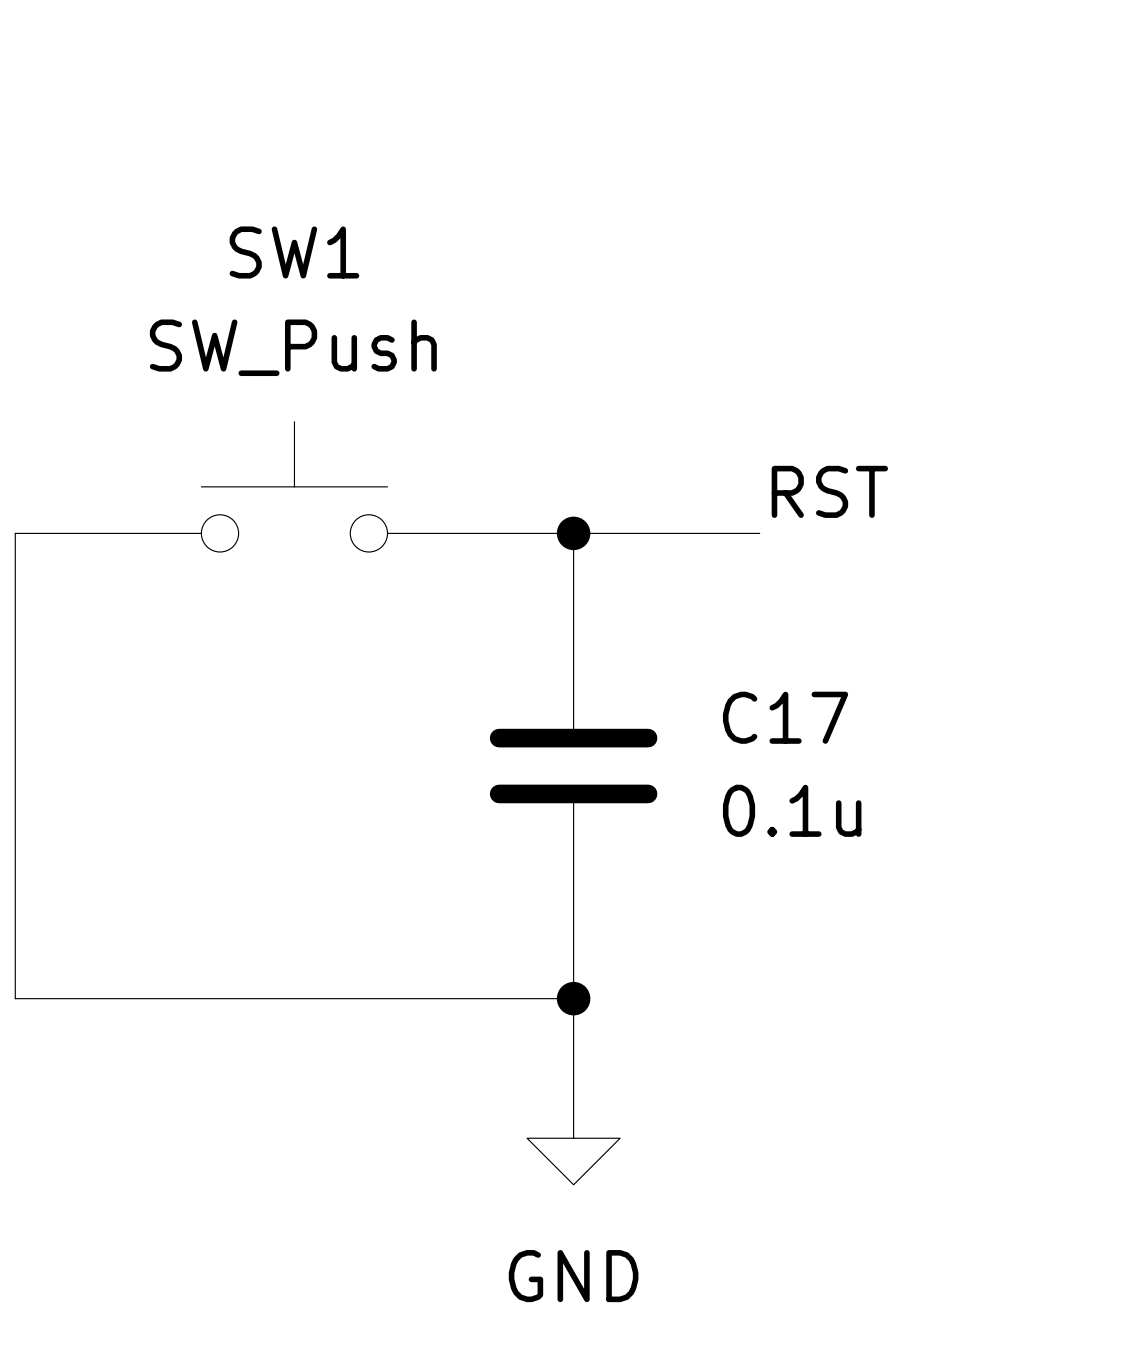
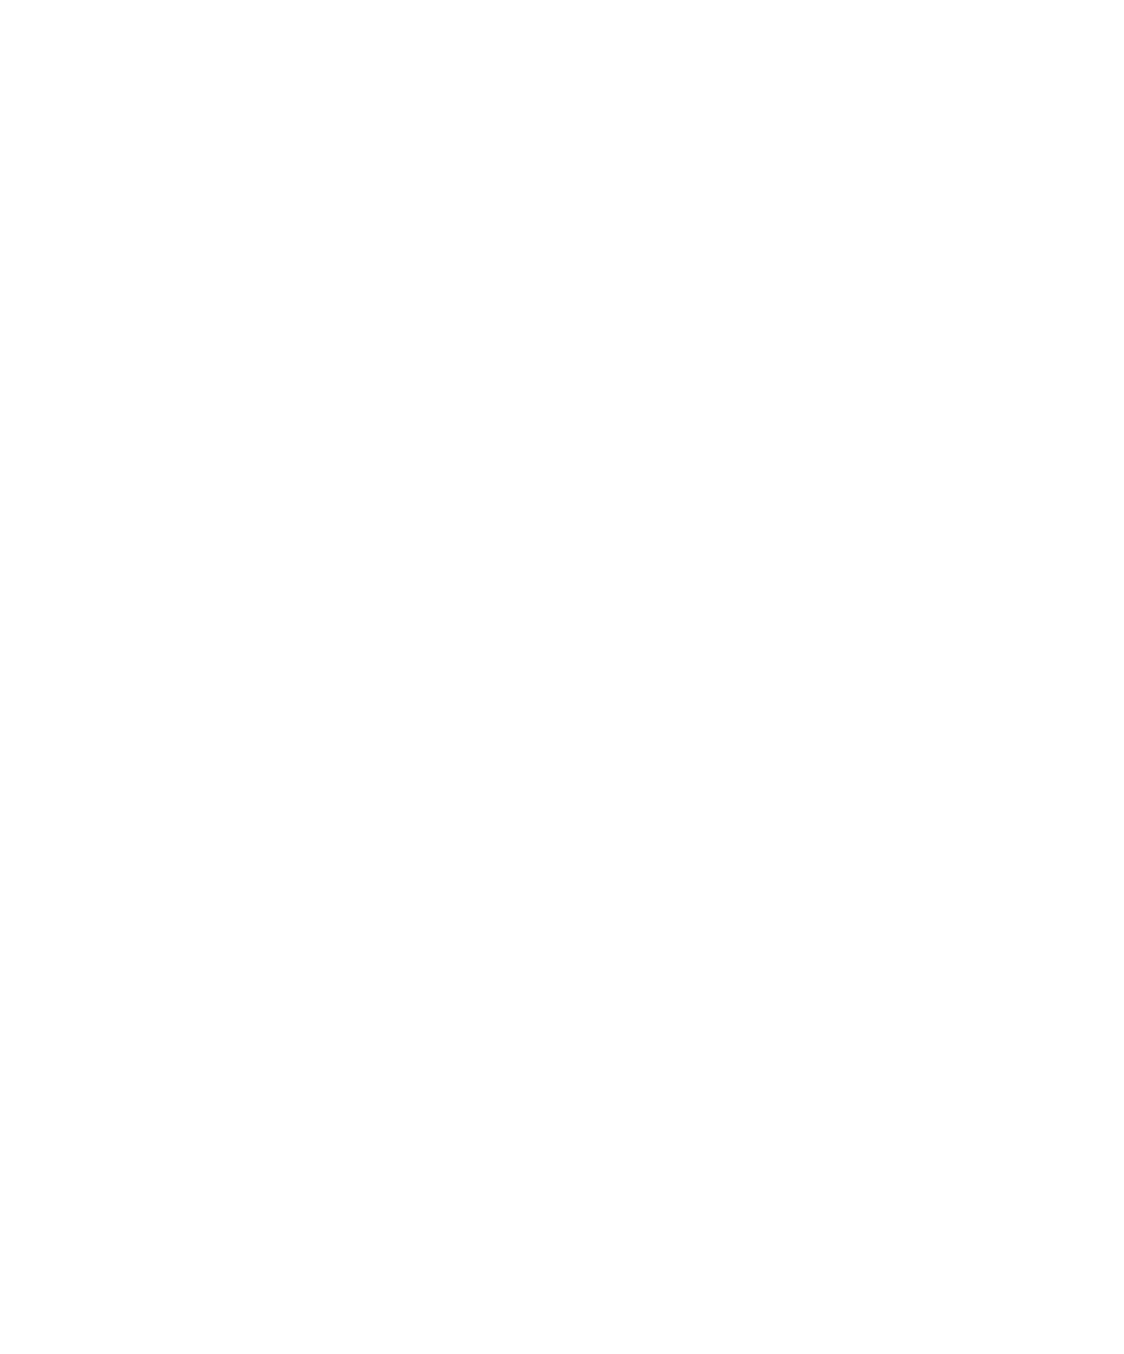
SW1: SW_Push (294, 486) -> none
label: RST (829, 491) -> none
wire: (108, 533) (15, 533) (15, 998) (573, 998) -> none
wire: (480, 533) (759, 533) -> none
wire: (573, 533) (573, 626) -> none
junction: (573, 533) -> none
C17: 0.1u (573, 766) -> none
wire: (573, 905) (573, 1091) -> none
junction: (573, 998) -> none
power symbol: GND (573, 1138) -> none

